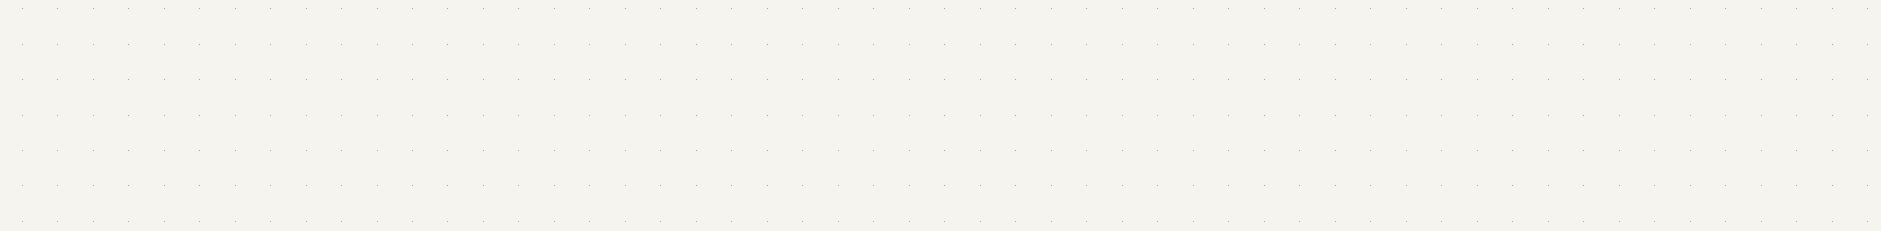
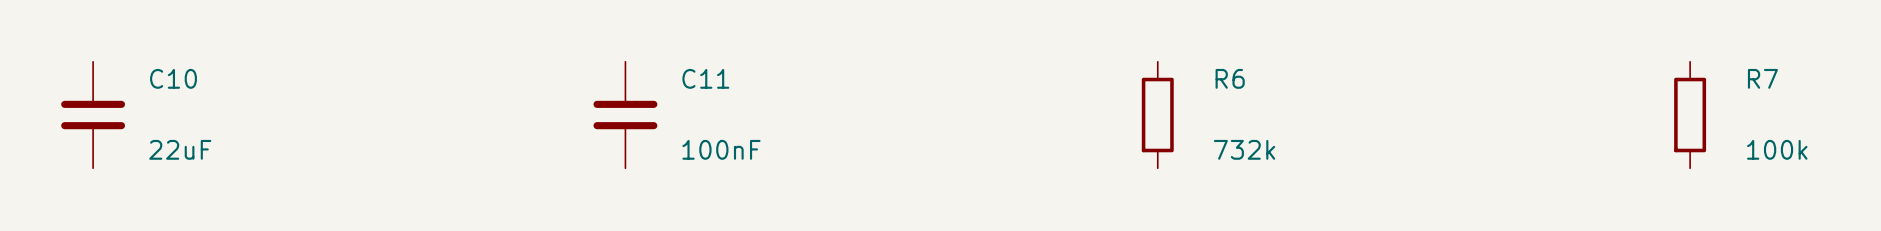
C10: none -> 22uF (93, 115)
C11: none -> 100nF (625, 115)
R6: none -> 732k (1157, 115)
R7: none -> 100k (1690, 115)

